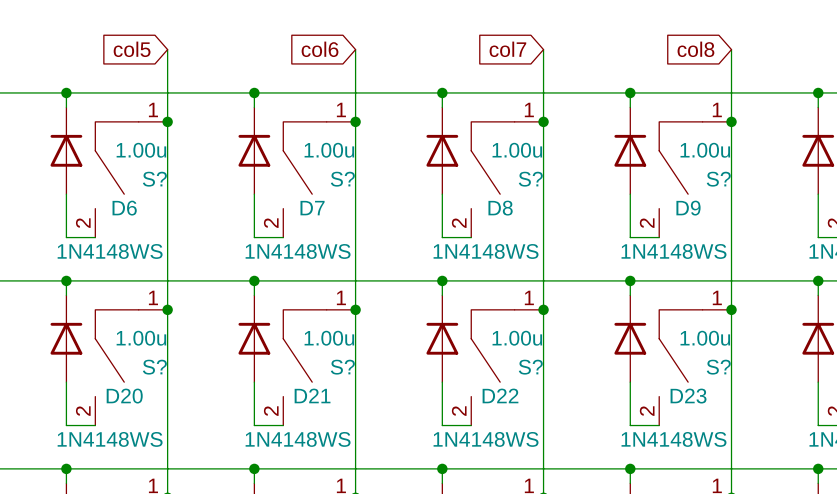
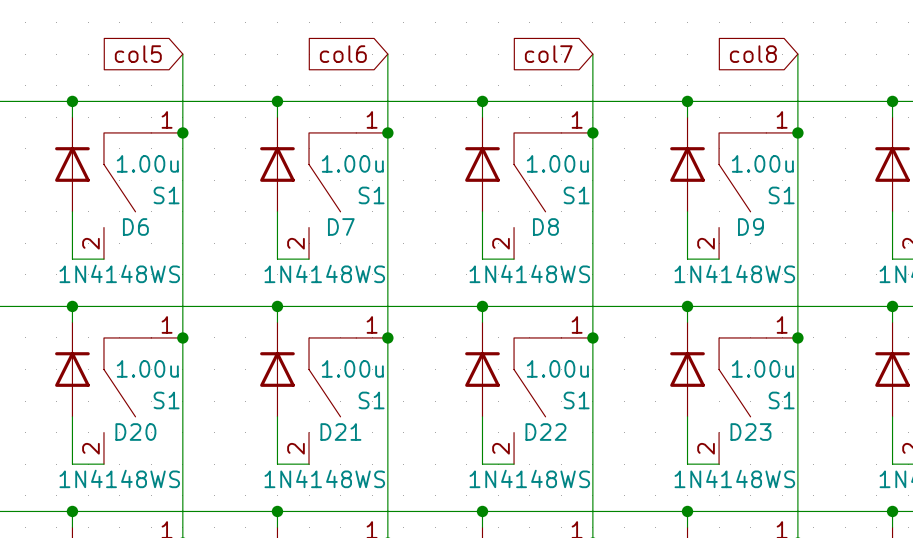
S? name: S? (154, 179) -> S1 (166, 195)
S? name: S? (342, 179) -> S1 (371, 195)
S? name: S? (530, 179) -> S1 (576, 195)
S? name: S? (718, 179) -> S1 (781, 195)
S? name: S? (154, 367) -> S1 (166, 400)
S? name: S? (342, 367) -> S1 (371, 400)
S? name: S? (530, 367) -> S1 (576, 400)
S? name: S? (718, 367) -> S1 (781, 400)

